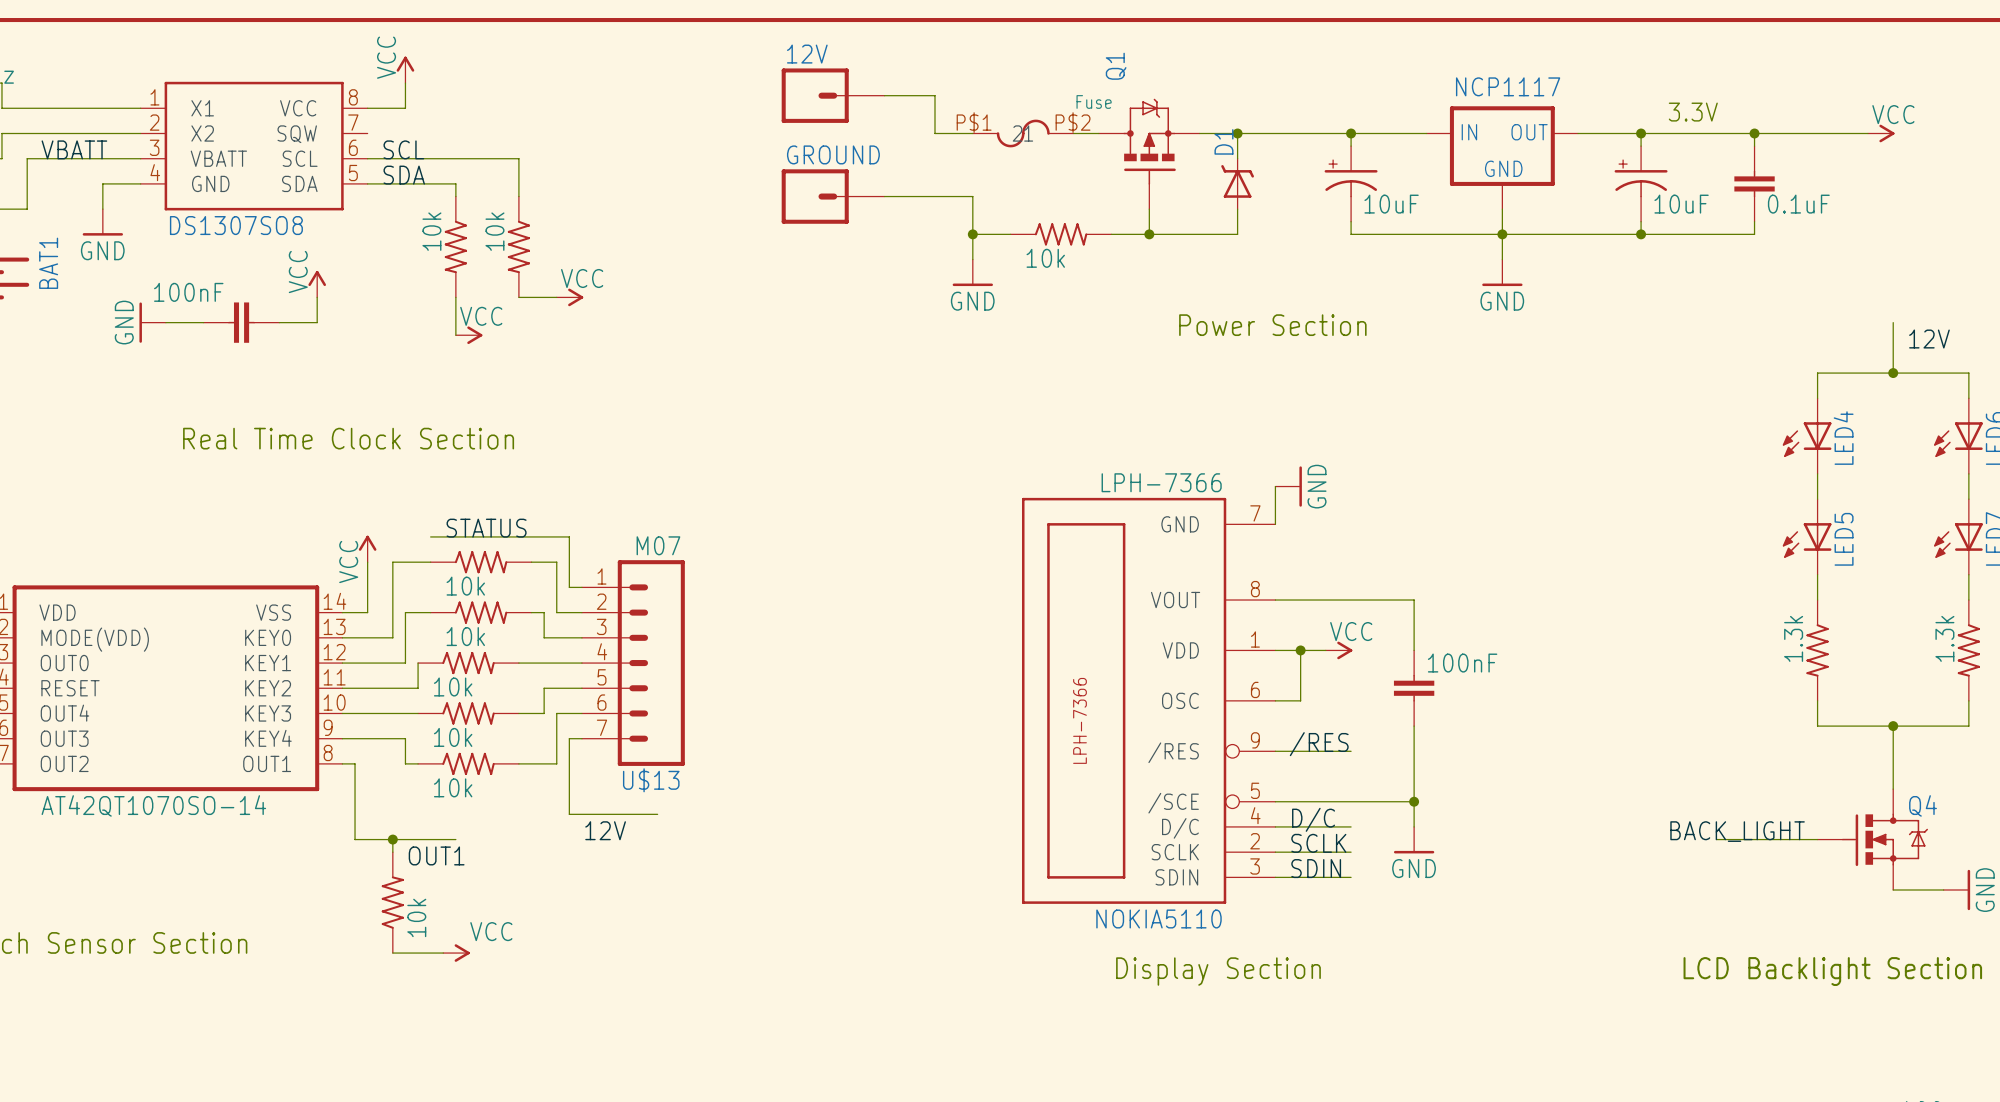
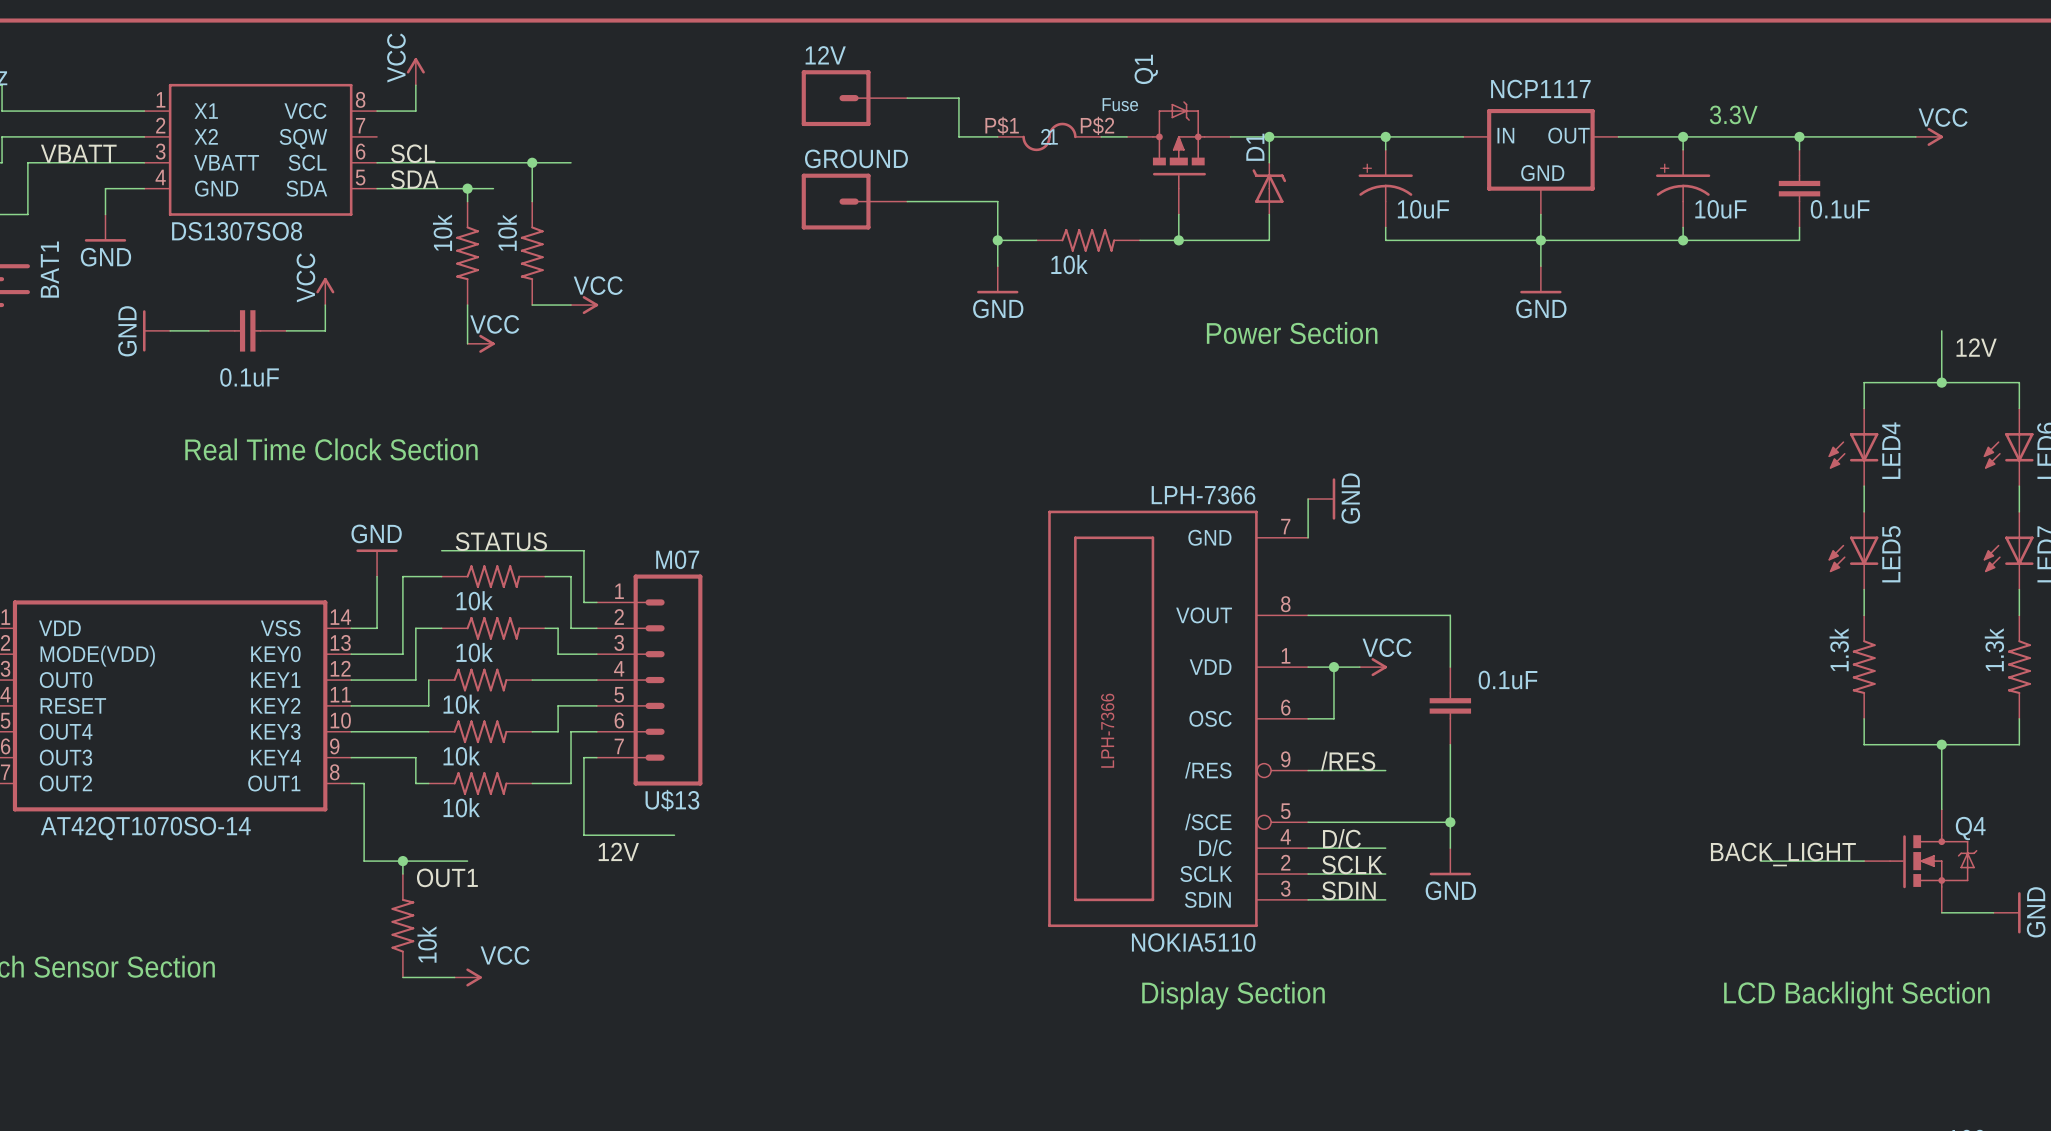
wire: none -> (532, 162) (571, 162)
junction: none -> (532, 162)
wire: none -> (467, 188) (493, 188)
junction: none -> (467, 188)
part value: 100nF (188, 292) -> 0.1uF (249, 377)
power symbol: VCC (367, 548) -> GND (377, 563)
part value: 100nF (1462, 663) -> 0.1uF (1508, 680)

